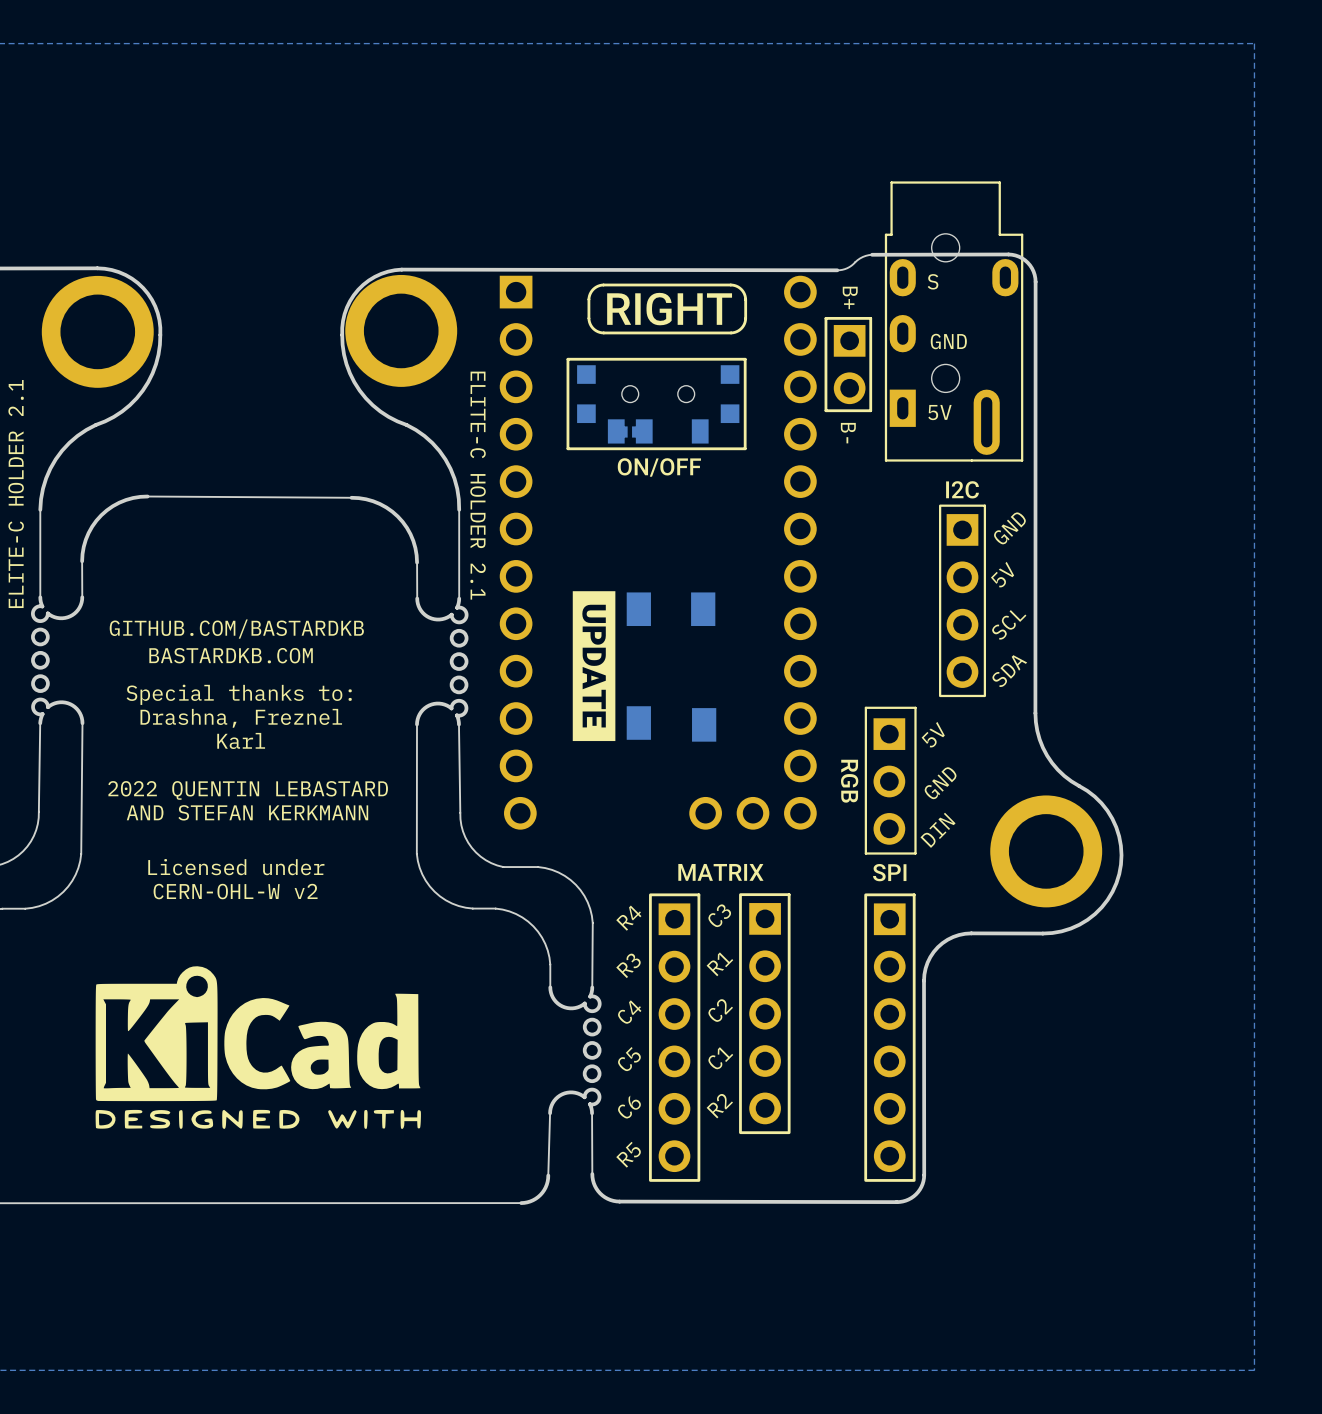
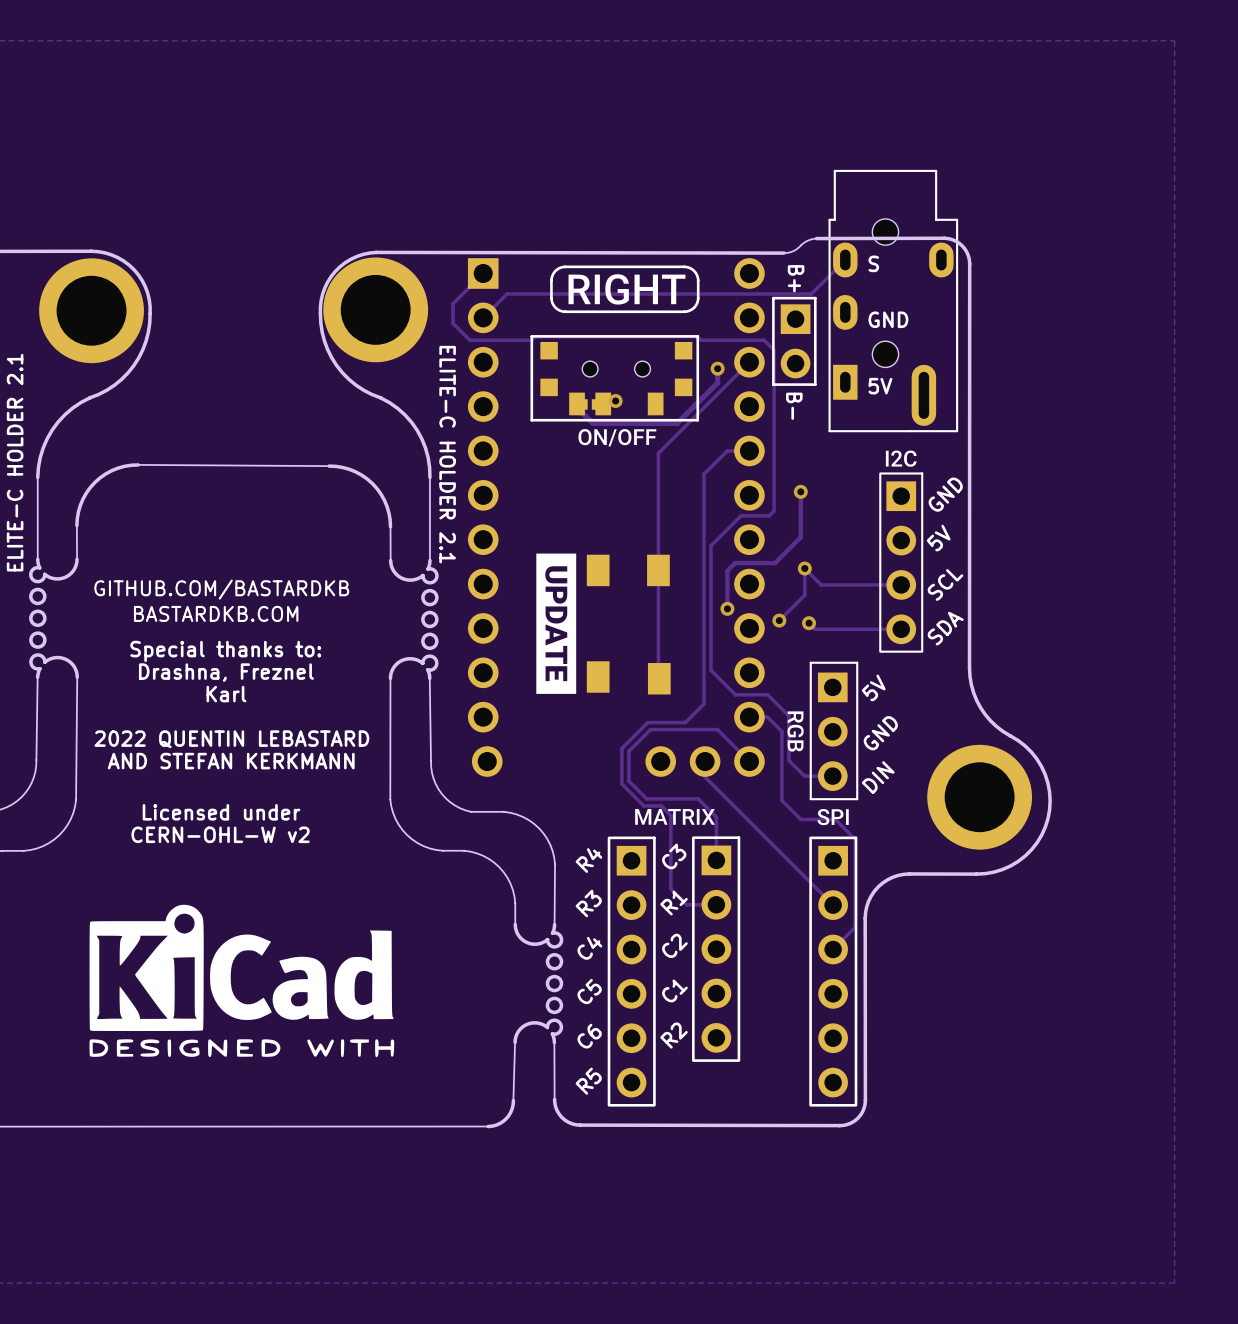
track: none -> (845, 260) (811, 294) (507, 294) (483, 317)
track: none -> (483, 273) (453, 303) (453, 323) (469, 340) (531, 340) (535, 336) (697, 336) (701, 340) (764, 340) (774, 350) (774, 511) (769, 515) (740, 515) (711, 545) (711, 670) (735, 694) (767, 694) (788, 715) (788, 760) (804, 776) (832, 776)
track: none -> (749, 362) (658, 453) (659, 678)
track: none -> (717, 368) (717, 382) (677, 423) (592, 423) (577, 407) (577, 403)
via: none -> (717, 368)
via: none -> (615, 401)
track: none -> (749, 450) (727, 450) (704, 474) (704, 703) (685, 722) (647, 722) (621, 748) (621, 783) (643, 805) (661, 805) (671, 816) (670, 888) (686, 904) (716, 904)
track: none -> (800, 491) (800, 537) (774, 563) (735, 563) (727, 570) (727, 608)
via: none -> (800, 491)
via: none -> (804, 568)
track: none -> (901, 584) (821, 584) (804, 568) (804, 595) (779, 620)
via: none -> (727, 608)
via: none -> (779, 620)
track: none -> (809, 623) (815, 629) (901, 629)
via: none -> (809, 623)
track: none -> (749, 717) (767, 717) (781, 731) (781, 800) (800, 819) (835, 819) (855, 839) (855, 927) (833, 949)
track: none -> (705, 761) (705, 777) (833, 905)
track: none -> (749, 761) (717, 729) (650, 729) (628, 751) (628, 781) (646, 798) (698, 798) (716, 817) (716, 860)

